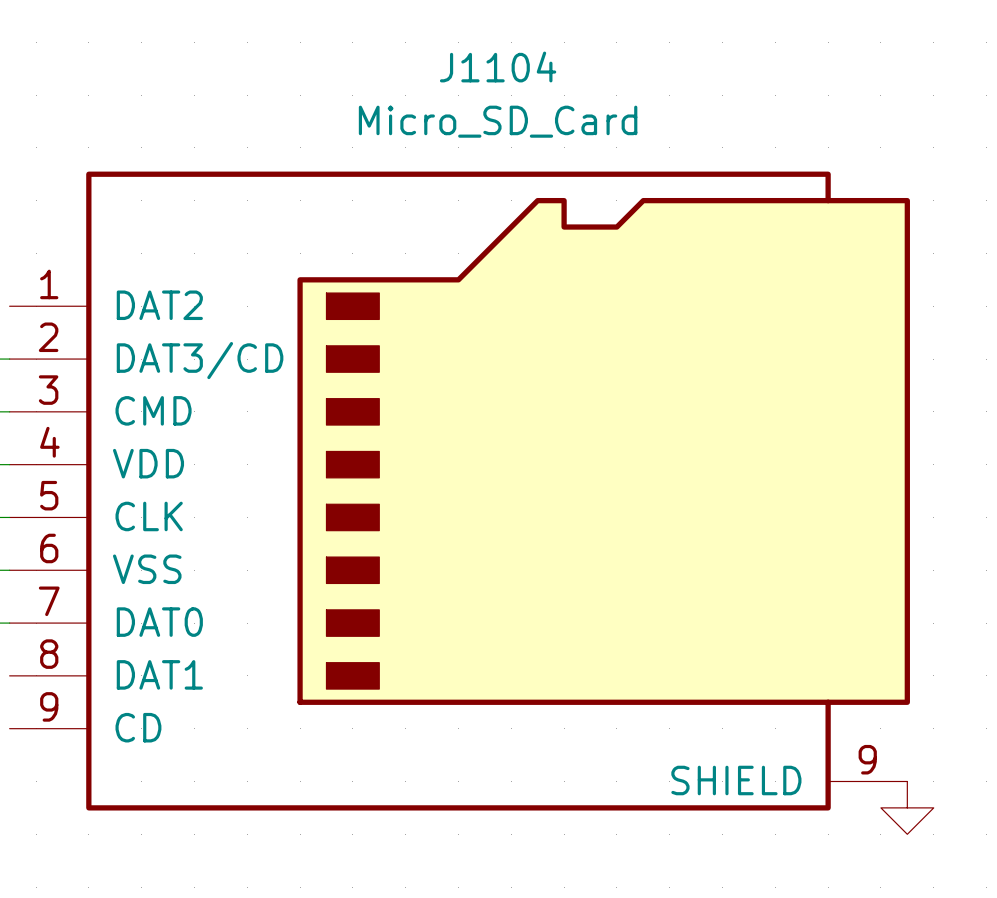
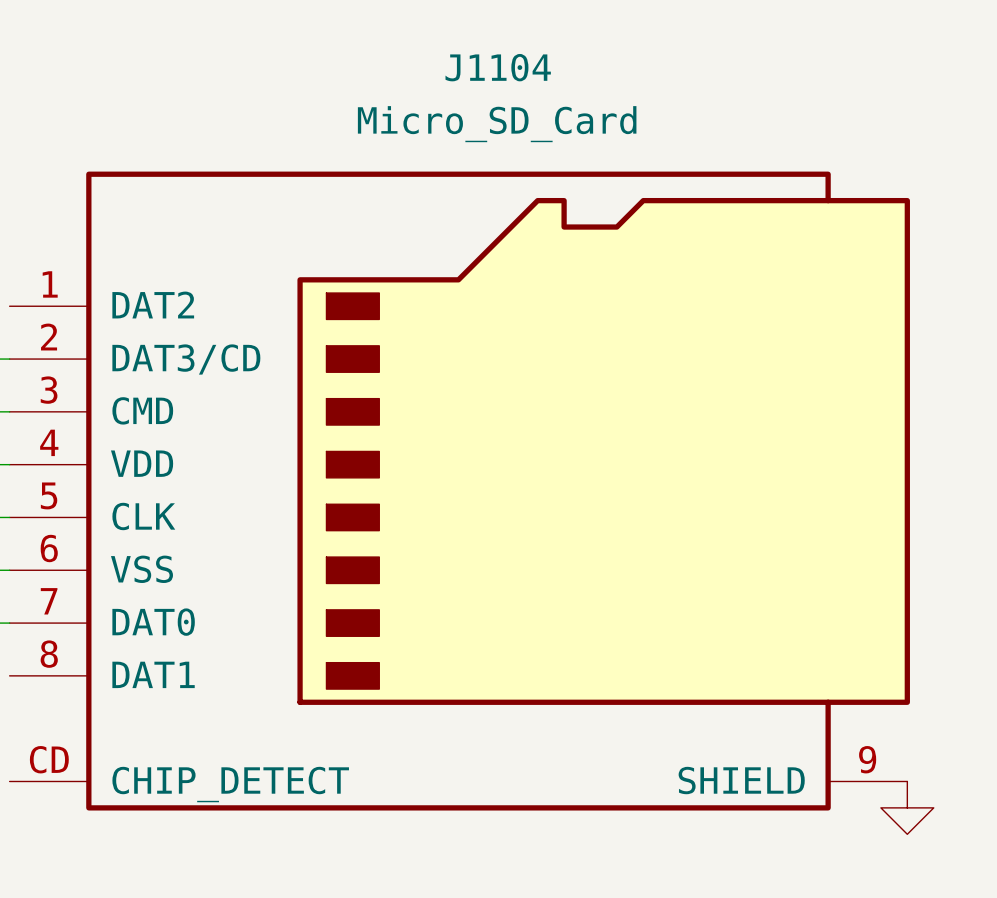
J1104 symbol: [9, 171, 910, 811] -> [9, 171, 910, 811]

